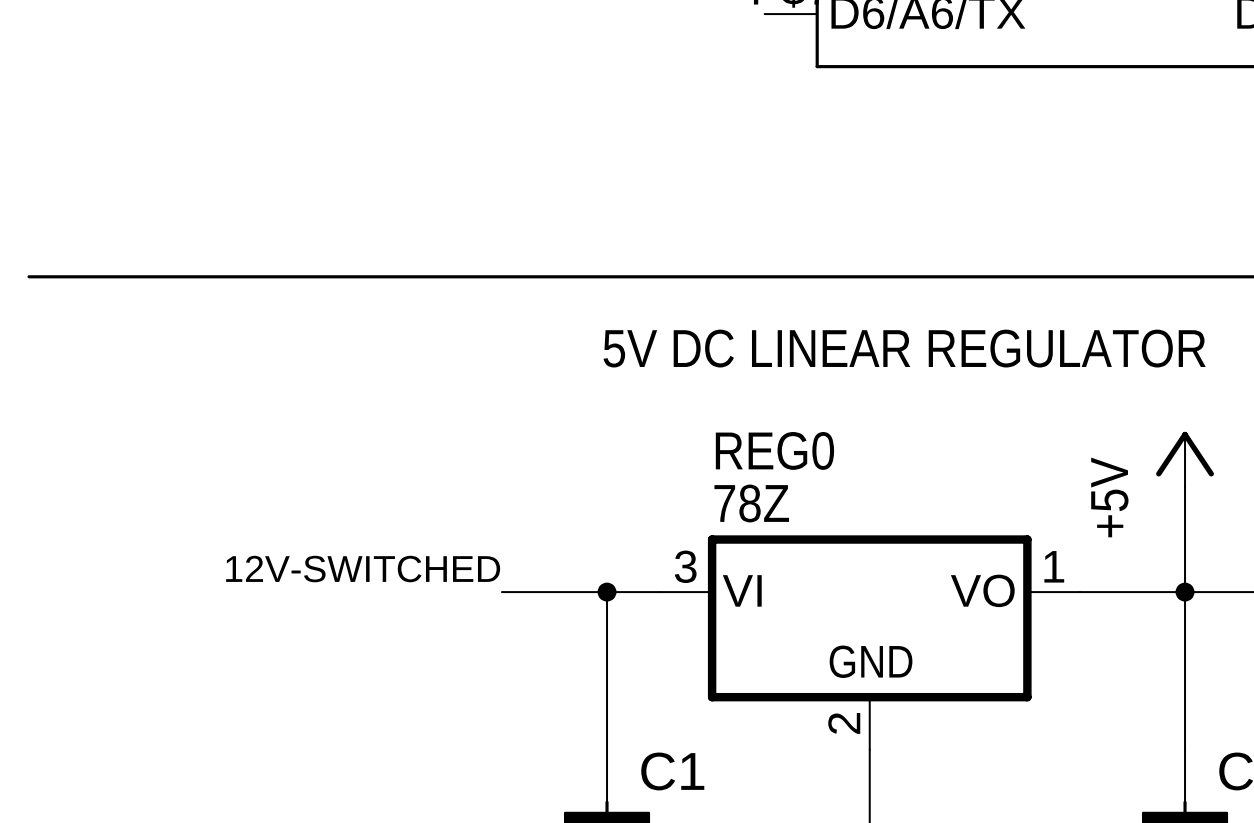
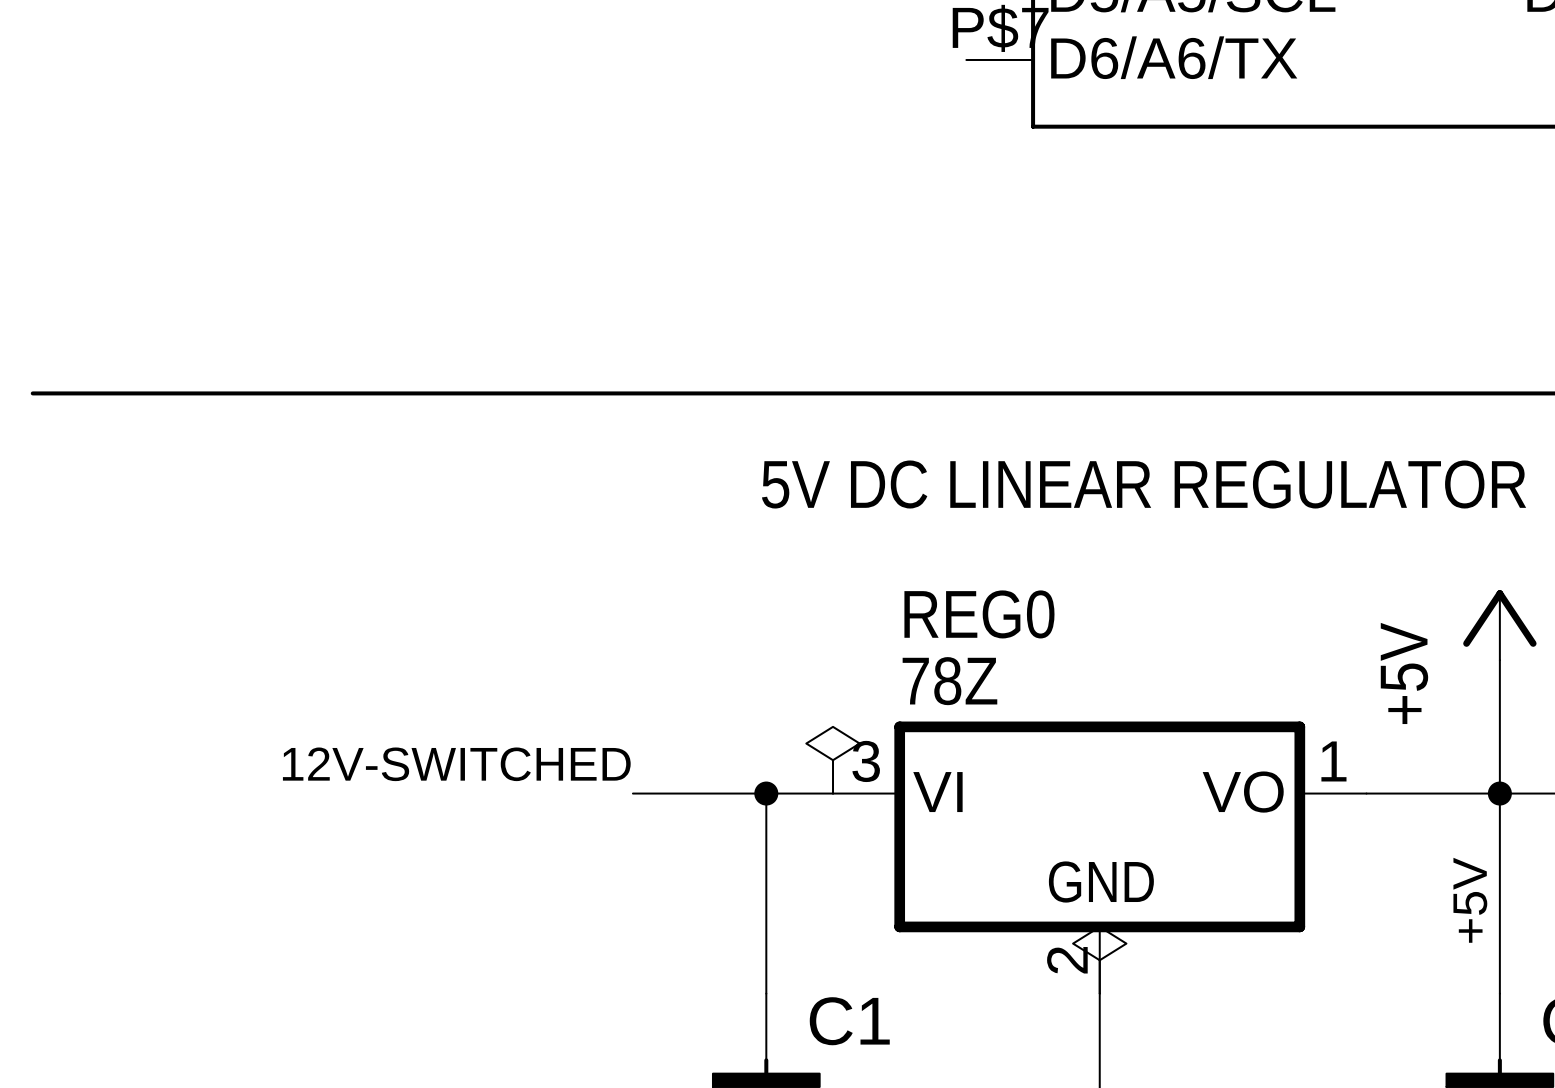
power symbol: none -> (833, 760)
label: none -> +5V (1470, 900)
power symbol: none -> (1099, 960)

